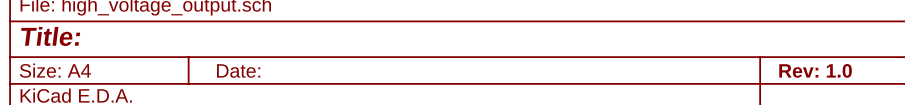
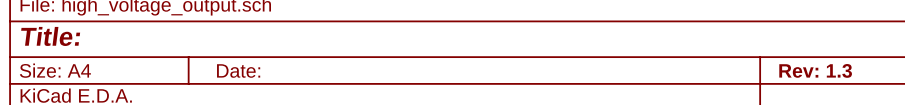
title block: Rev: 1.0 (815, 70) -> Rev: 1.3 (815, 70)

